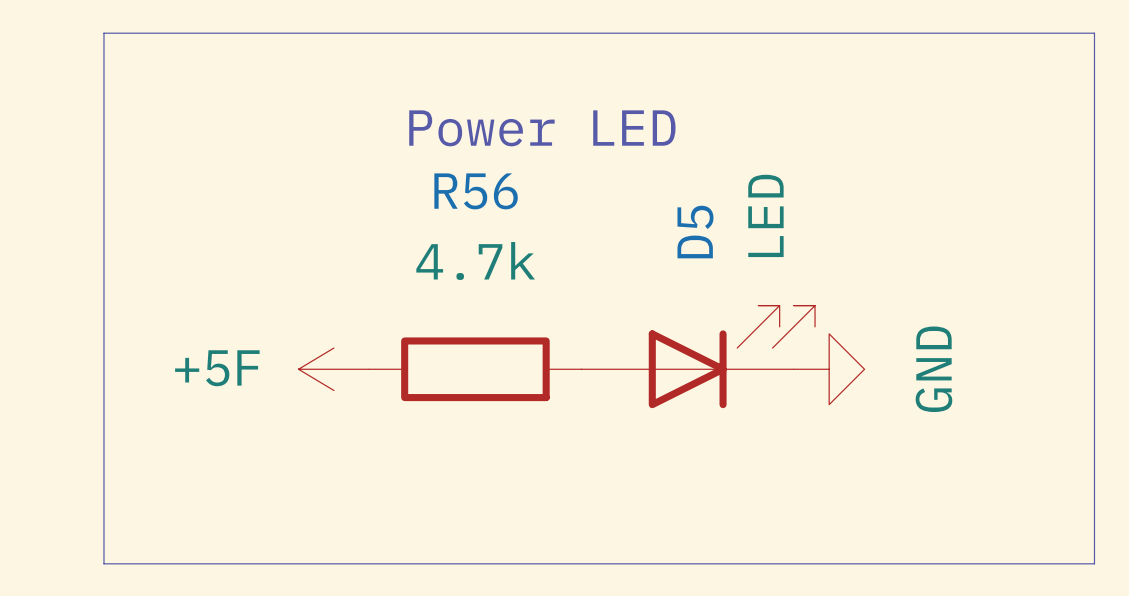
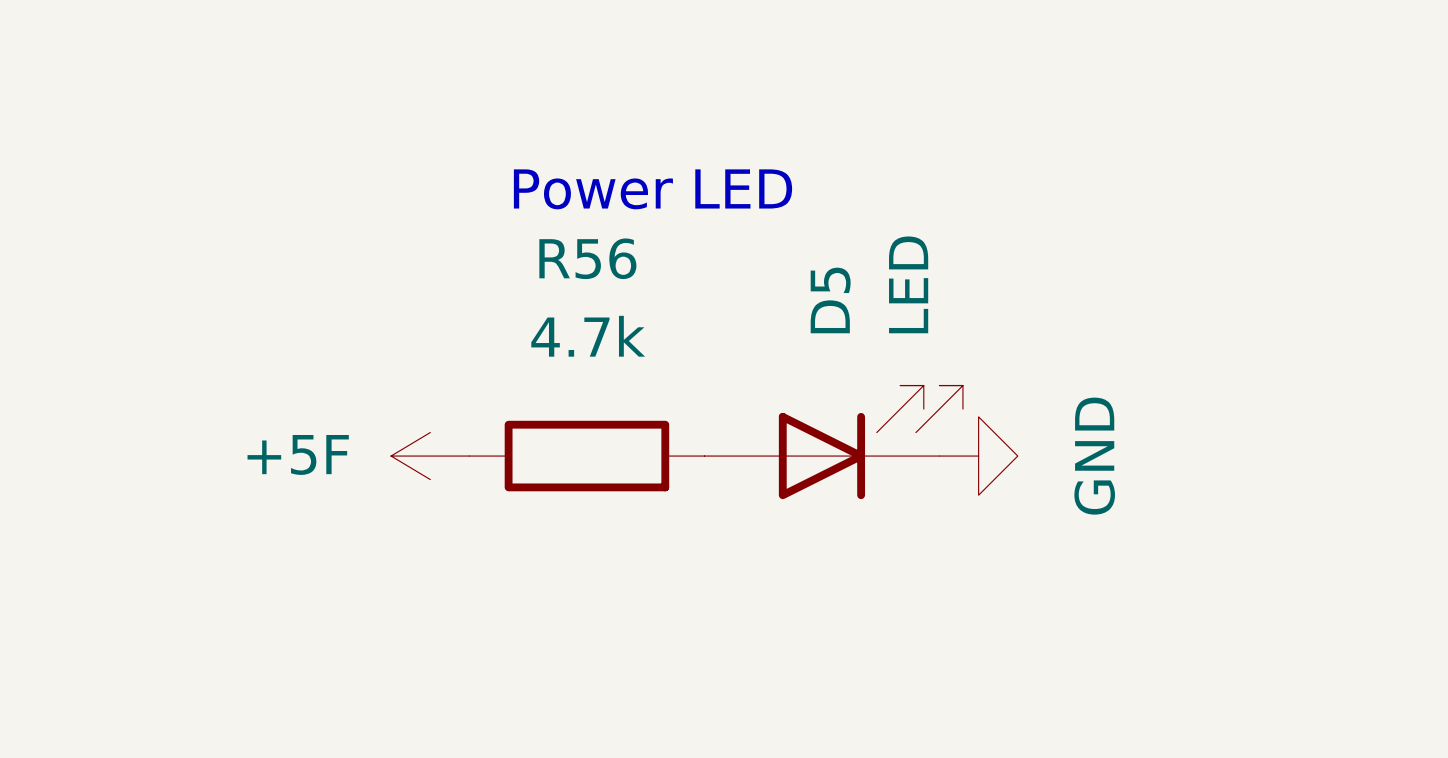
line: (103, 33) (1094, 33) (1094, 563) (103, 563) (103, 33) -> none

